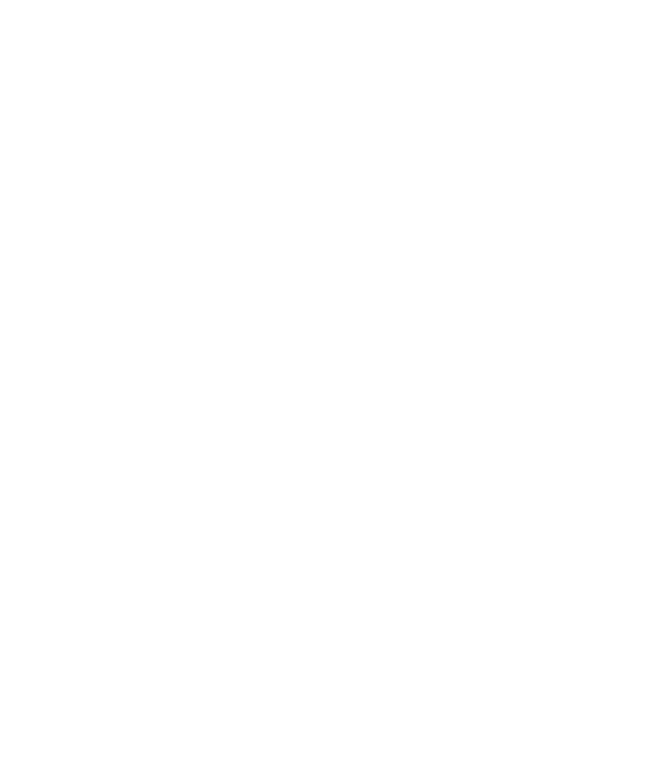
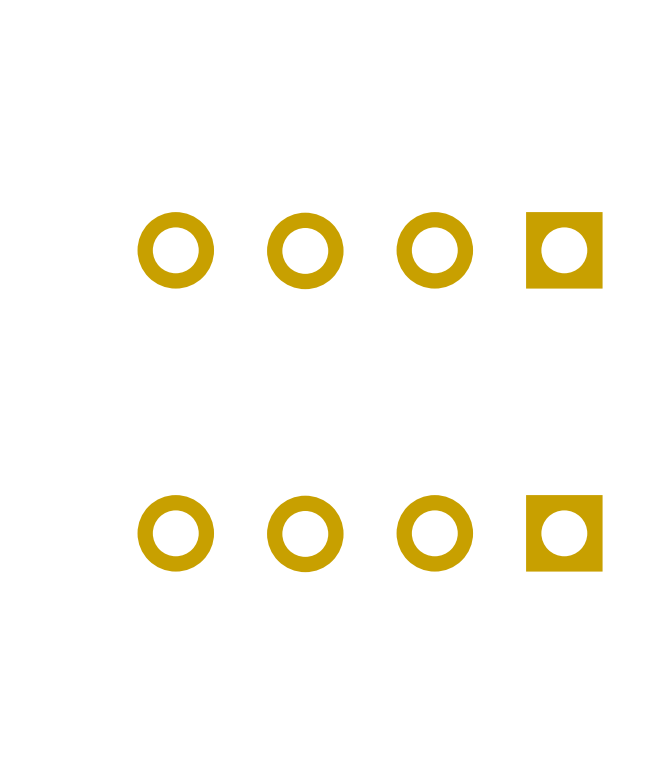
part: none -> (370, 250)
part: none -> (370, 533)

